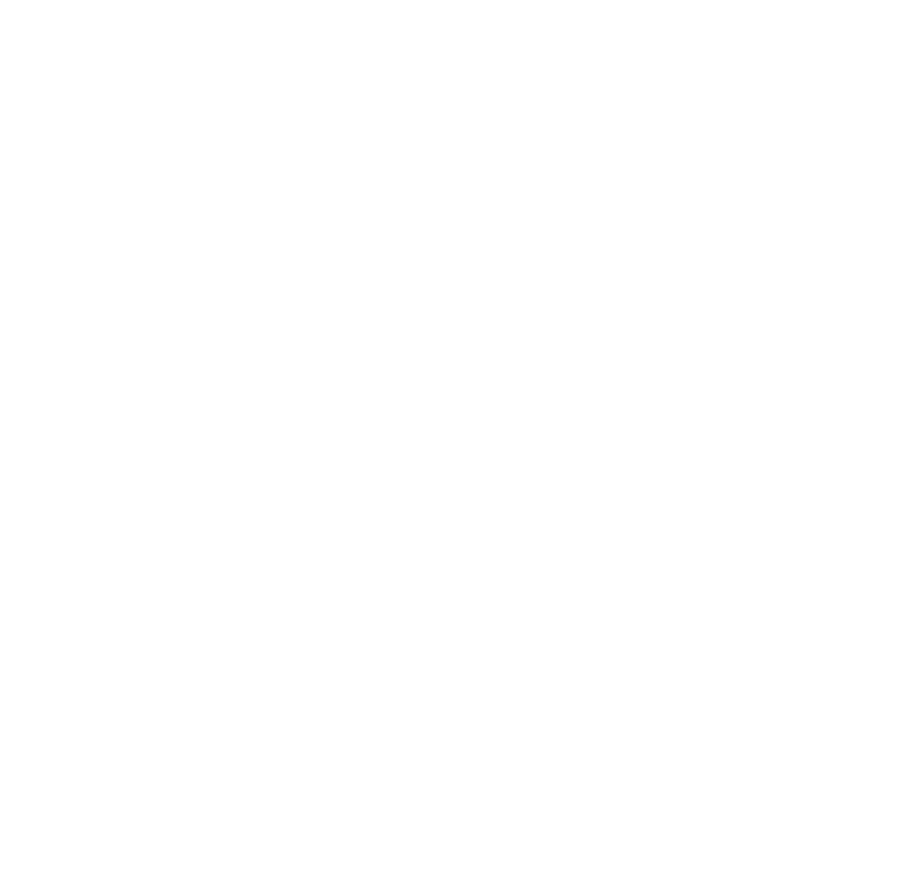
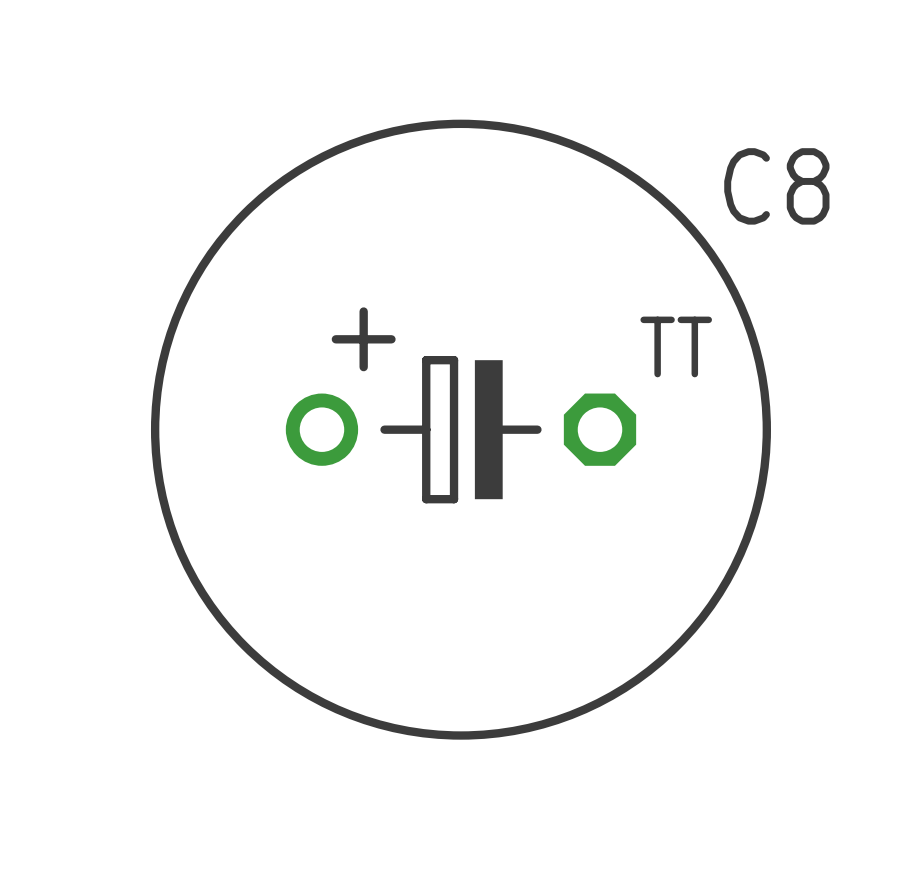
C8: none -> (460, 429)

